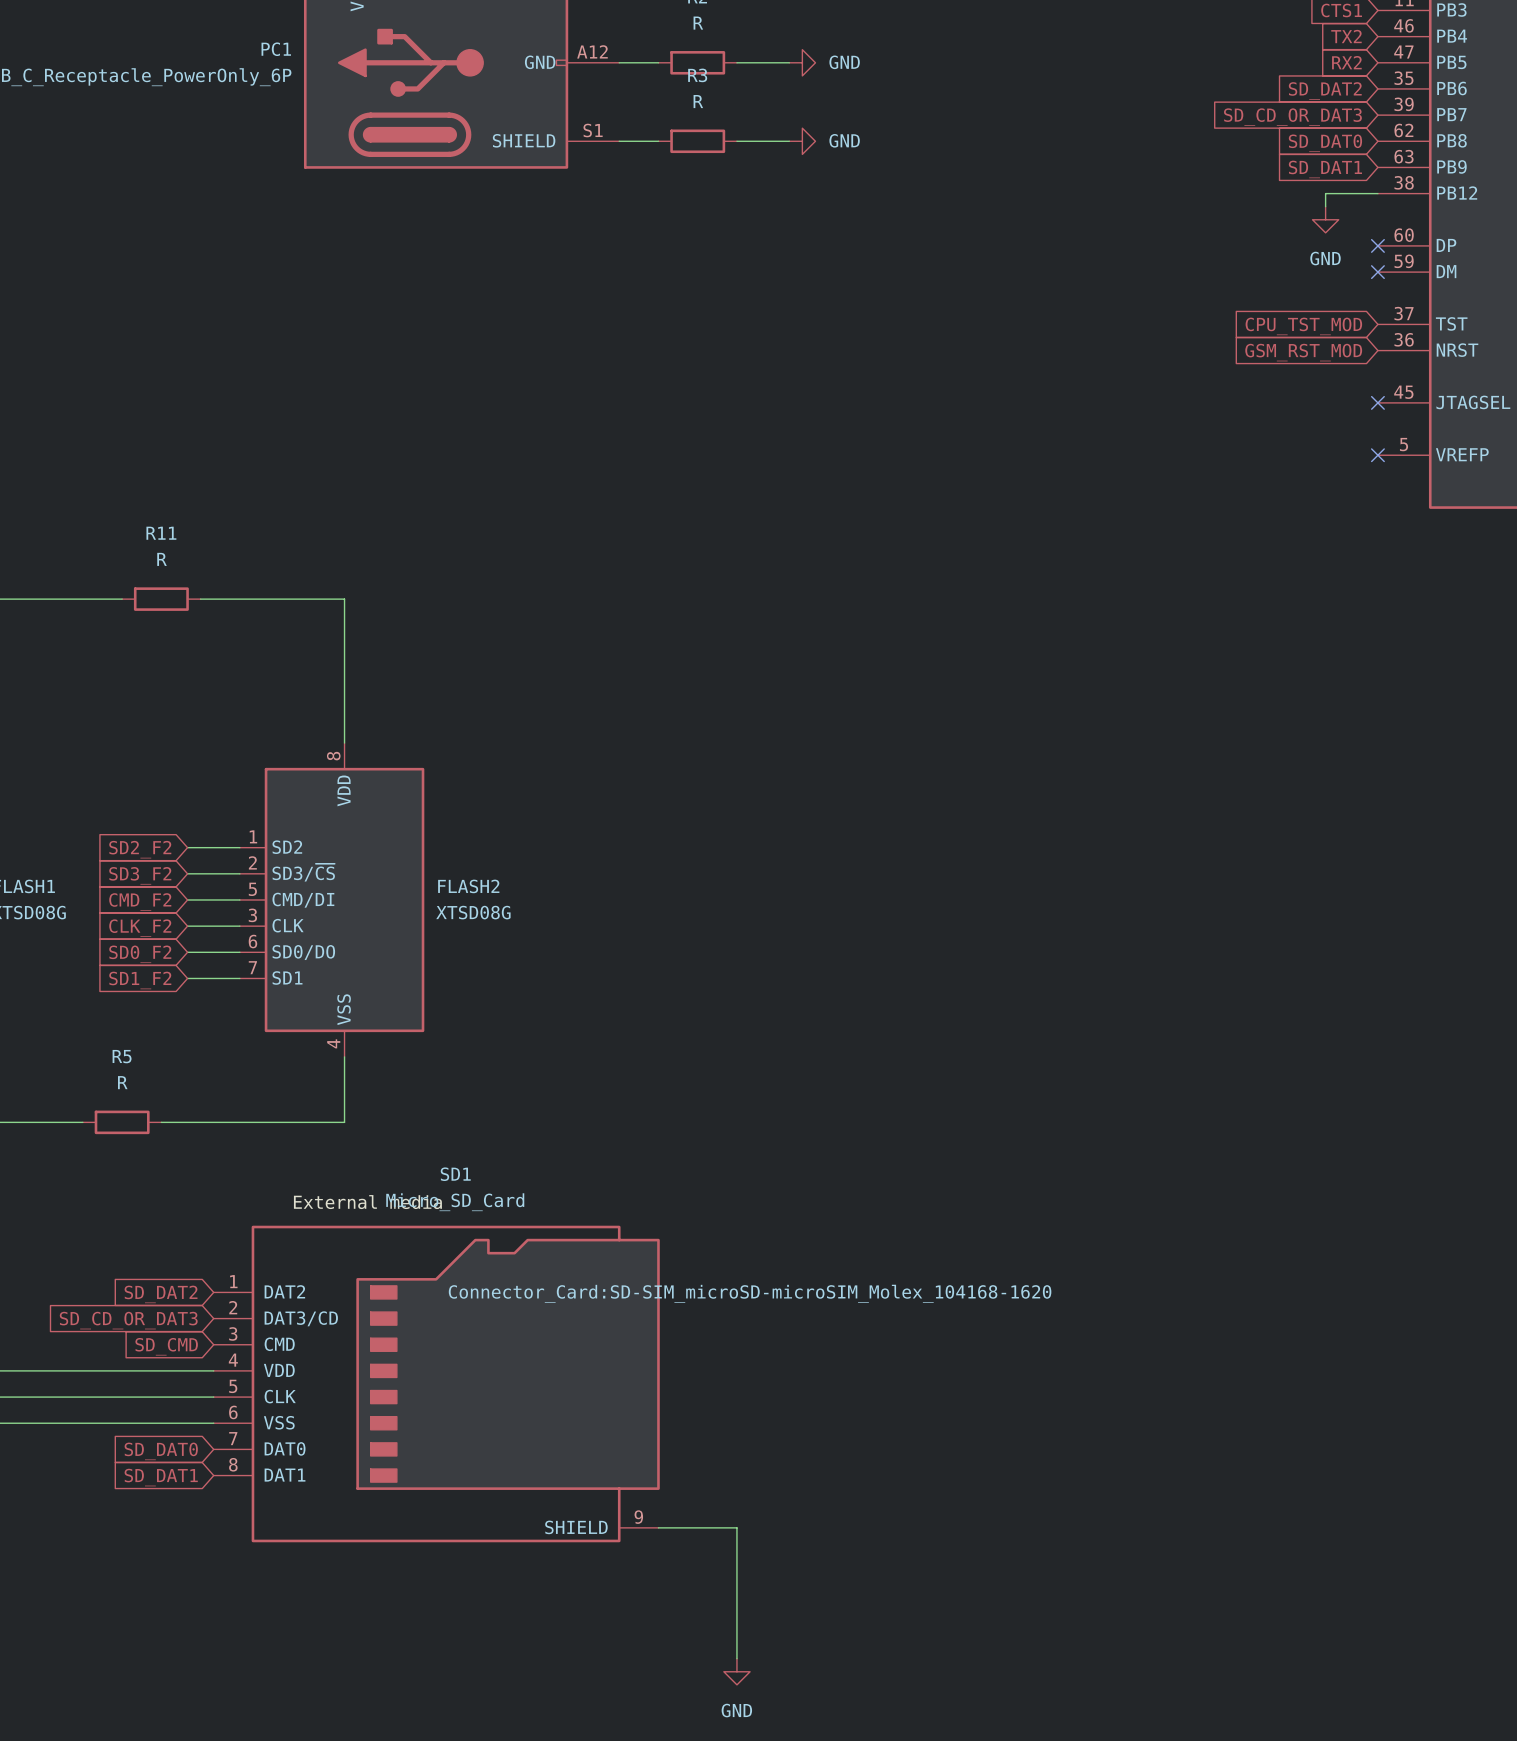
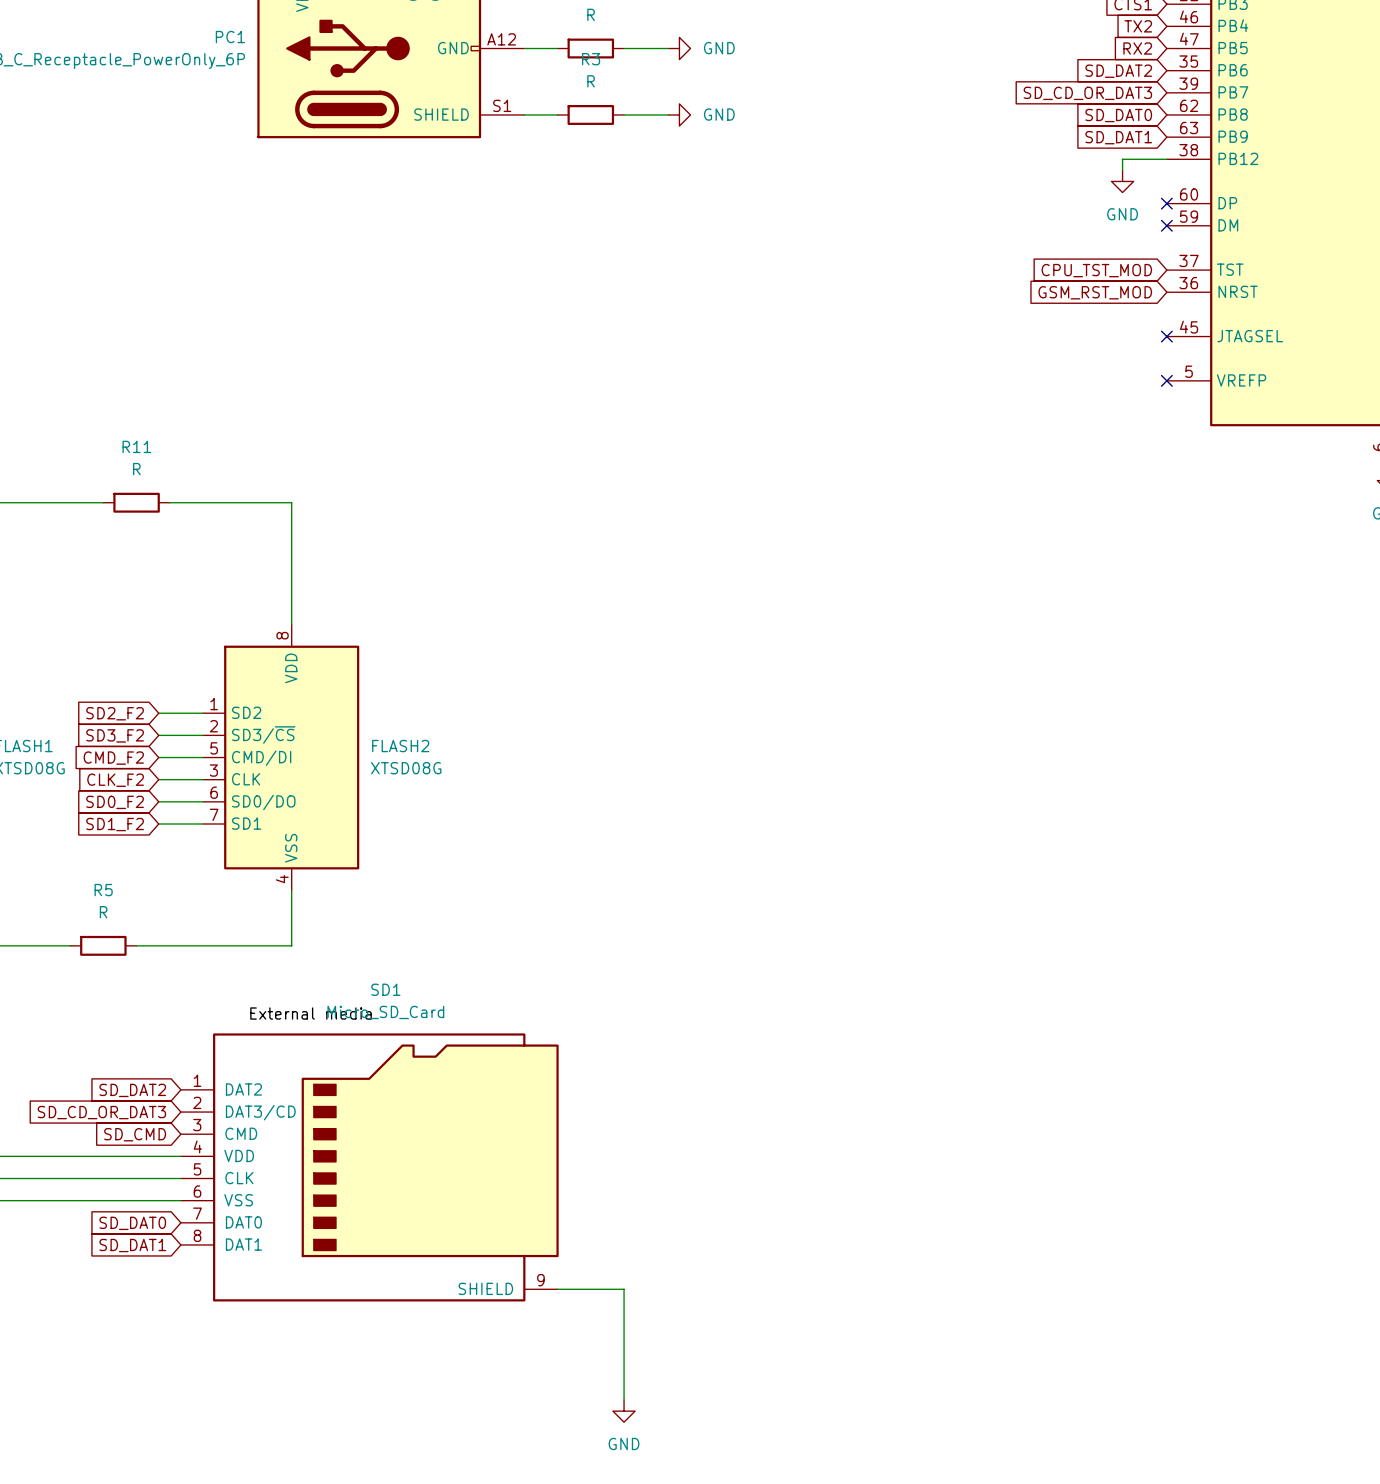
SD1 text: Connector_Card:SD-SIM_microSD-microSIM_Molex_104168-1620 (750, 1293) -> none

